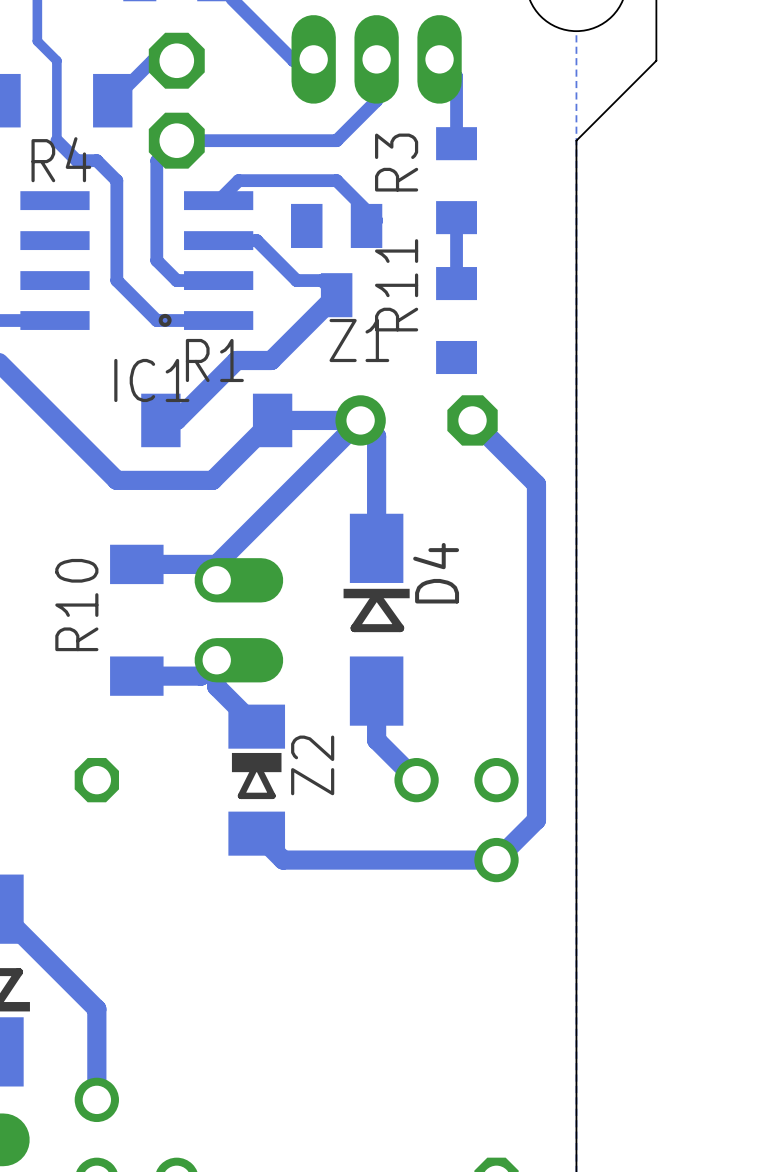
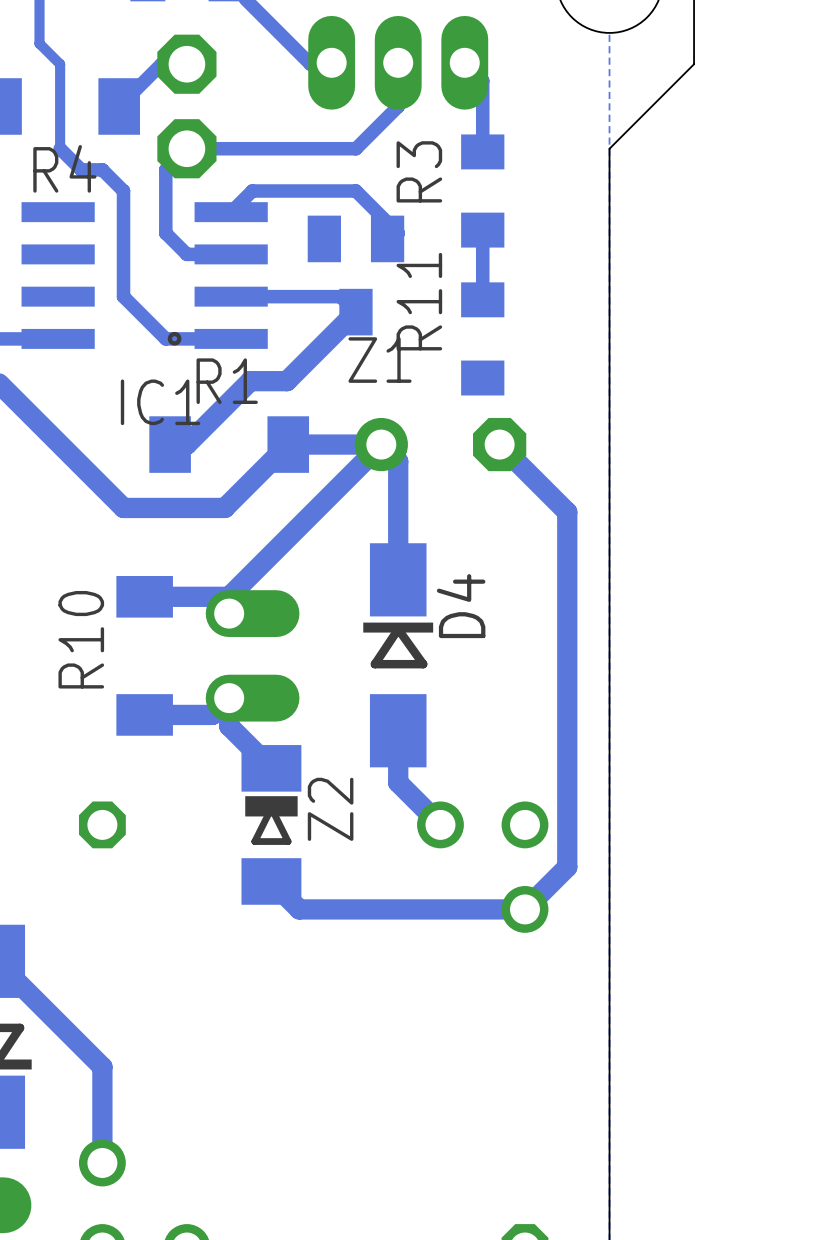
track: (156, 220) (156, 260) (176, 280) (218, 280) -> (165, 233) (186, 254) (231, 254)
track: (218, 240) (256, 240) (296, 280) -> (231, 296) (313, 296)

